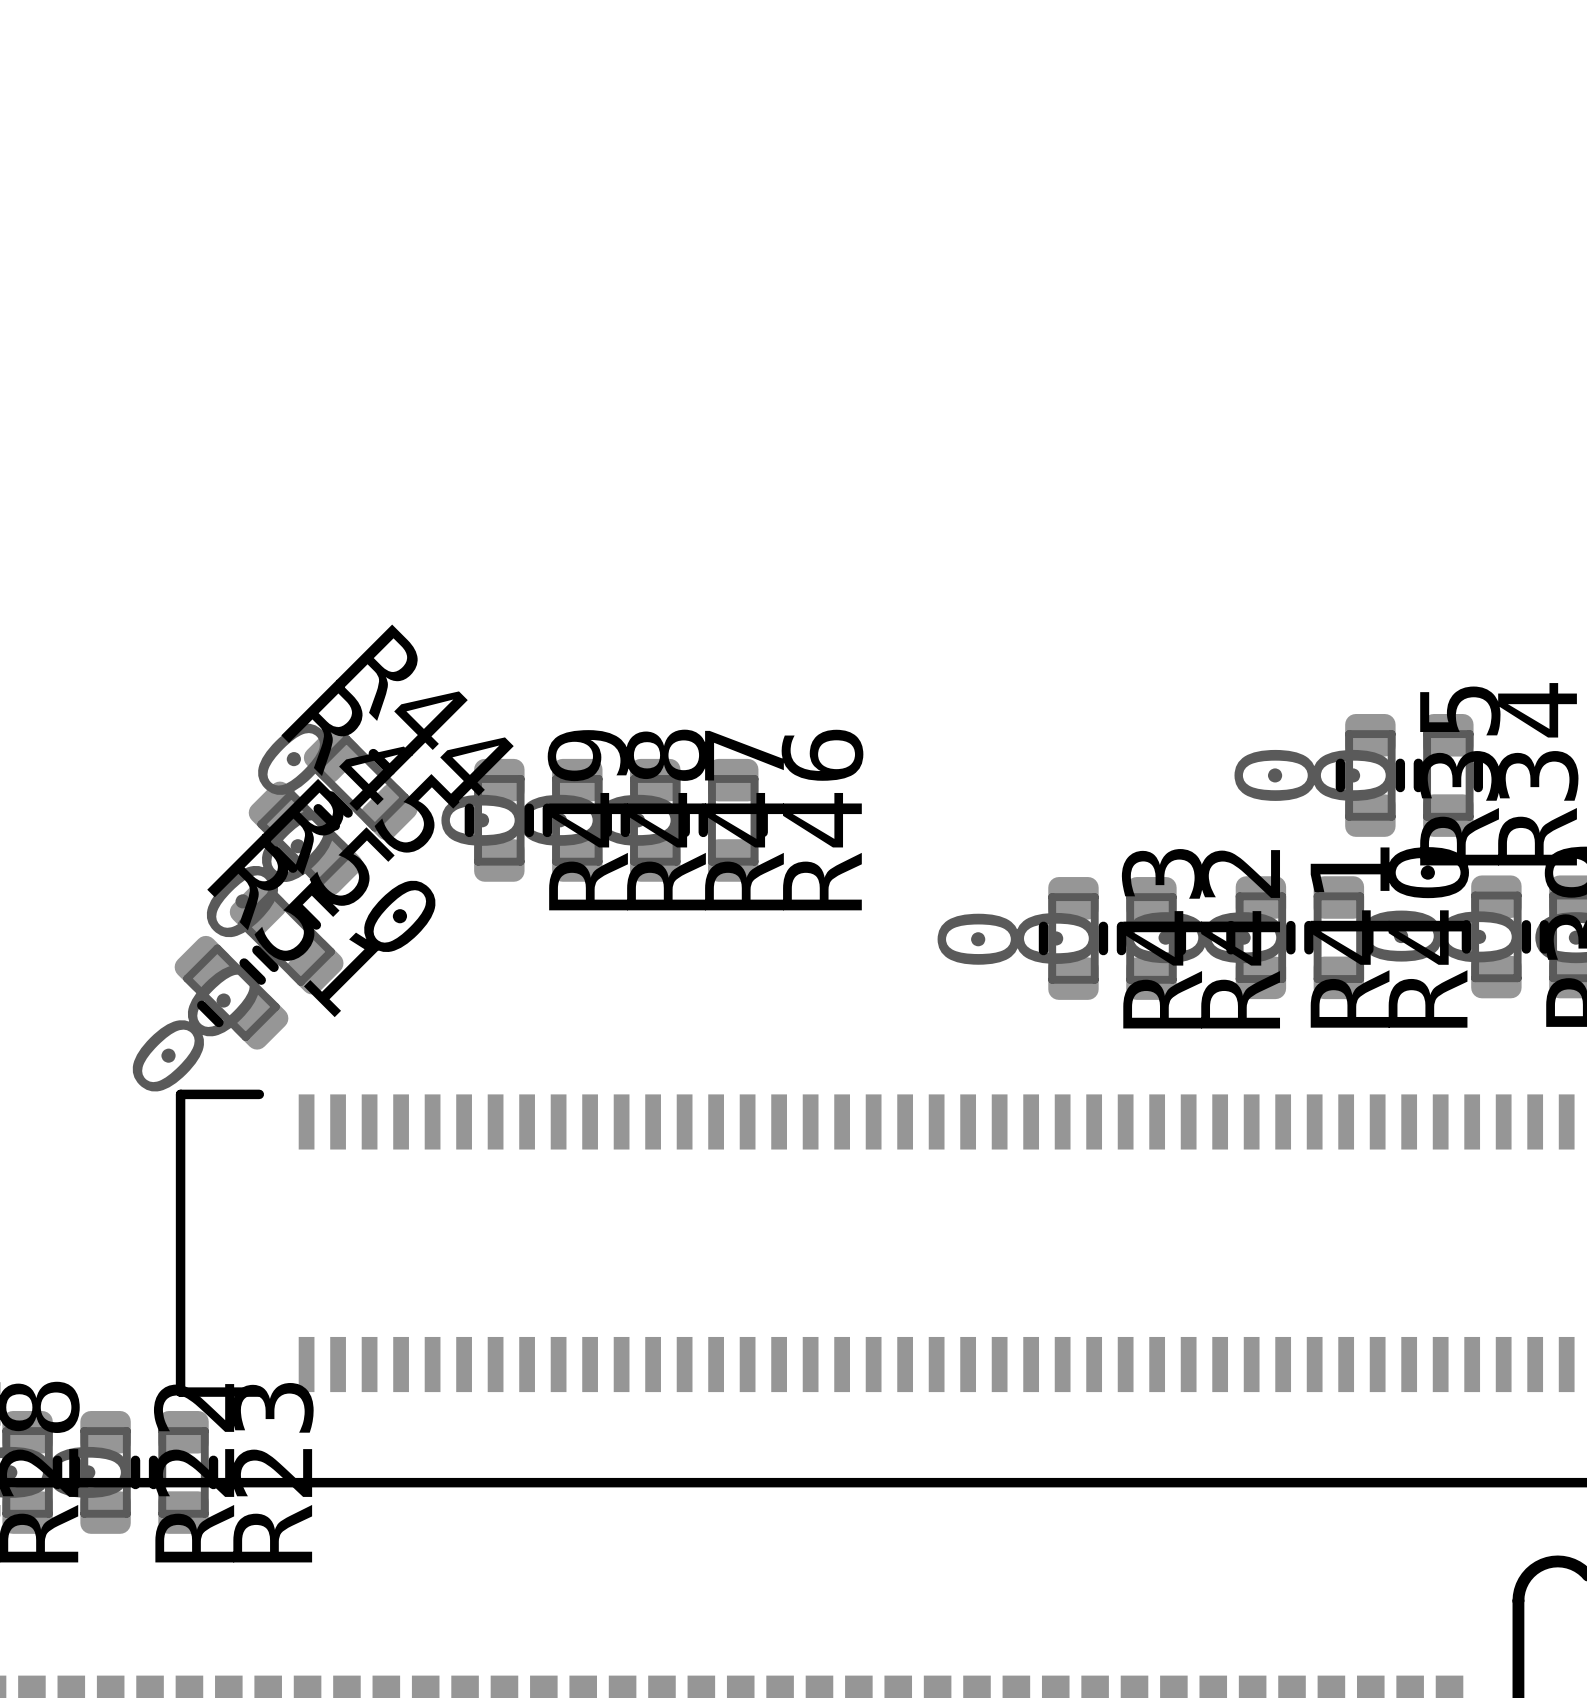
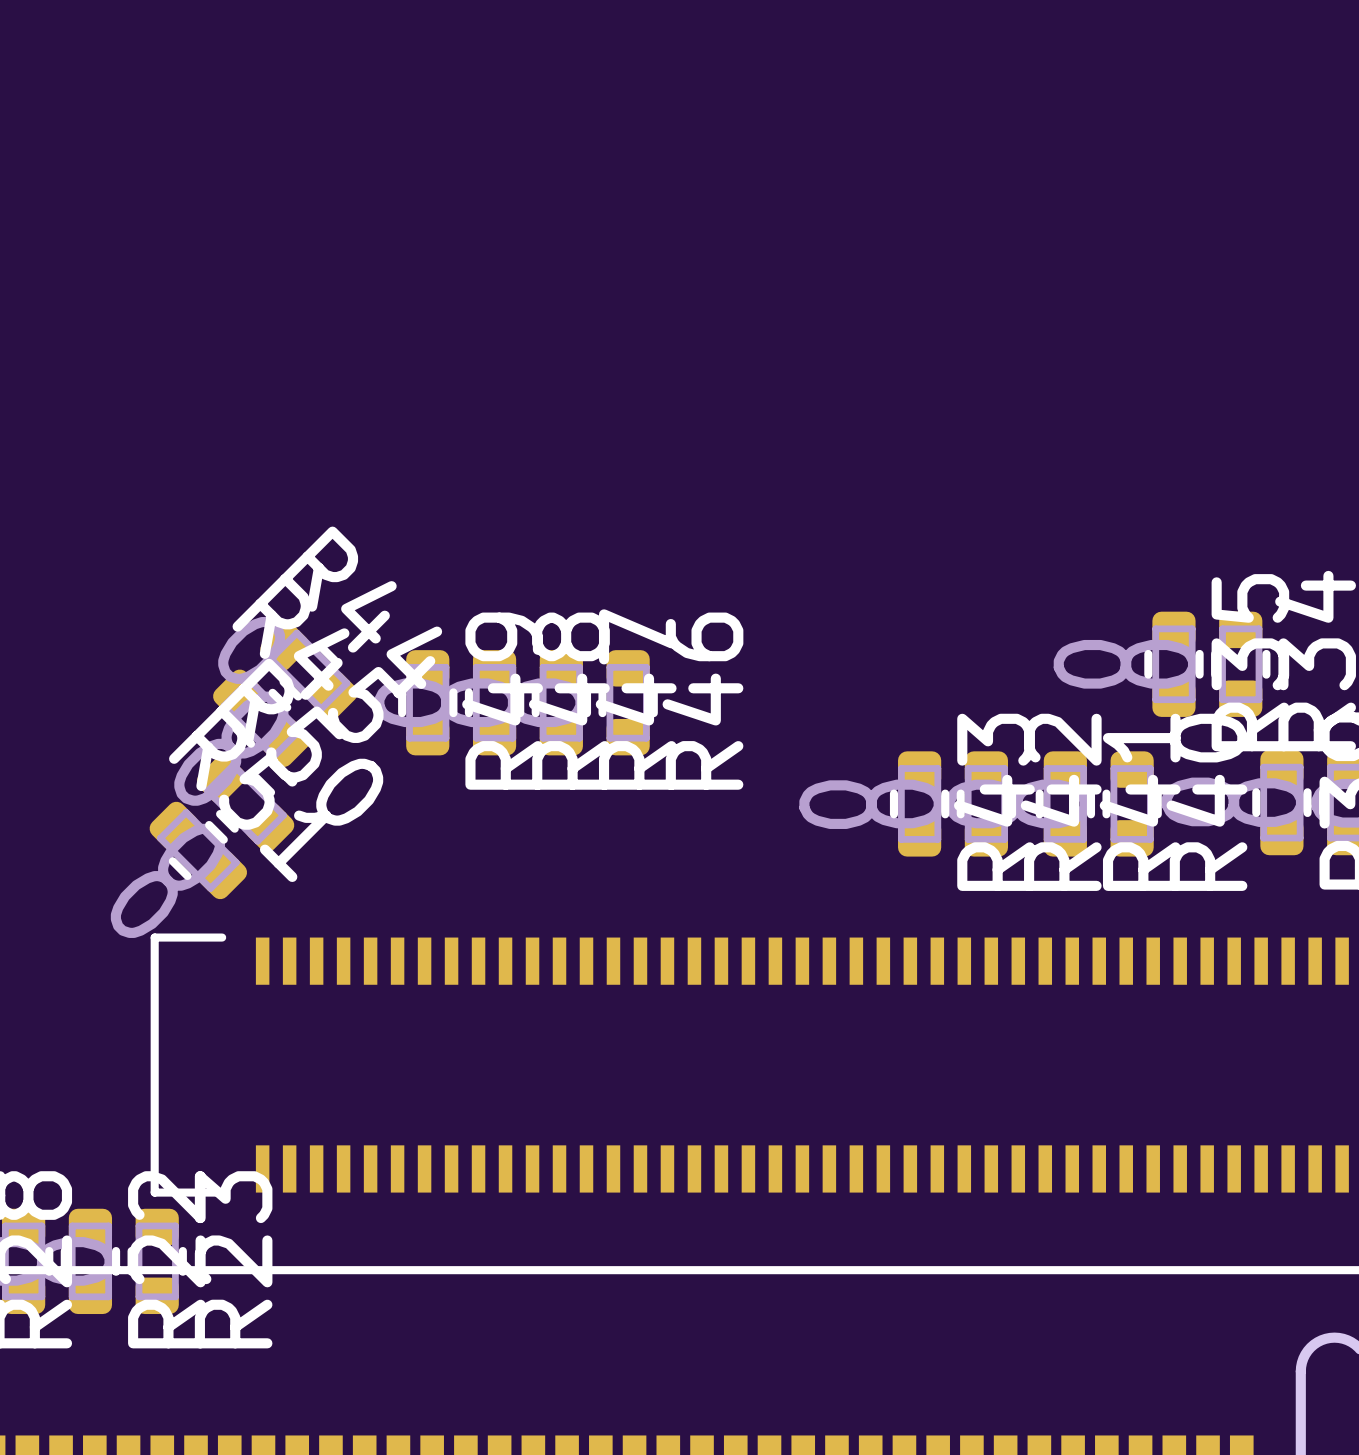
R41 position: (1260, 937) -> (1065, 803)
R40 position: (1338, 937) -> (1132, 803)

